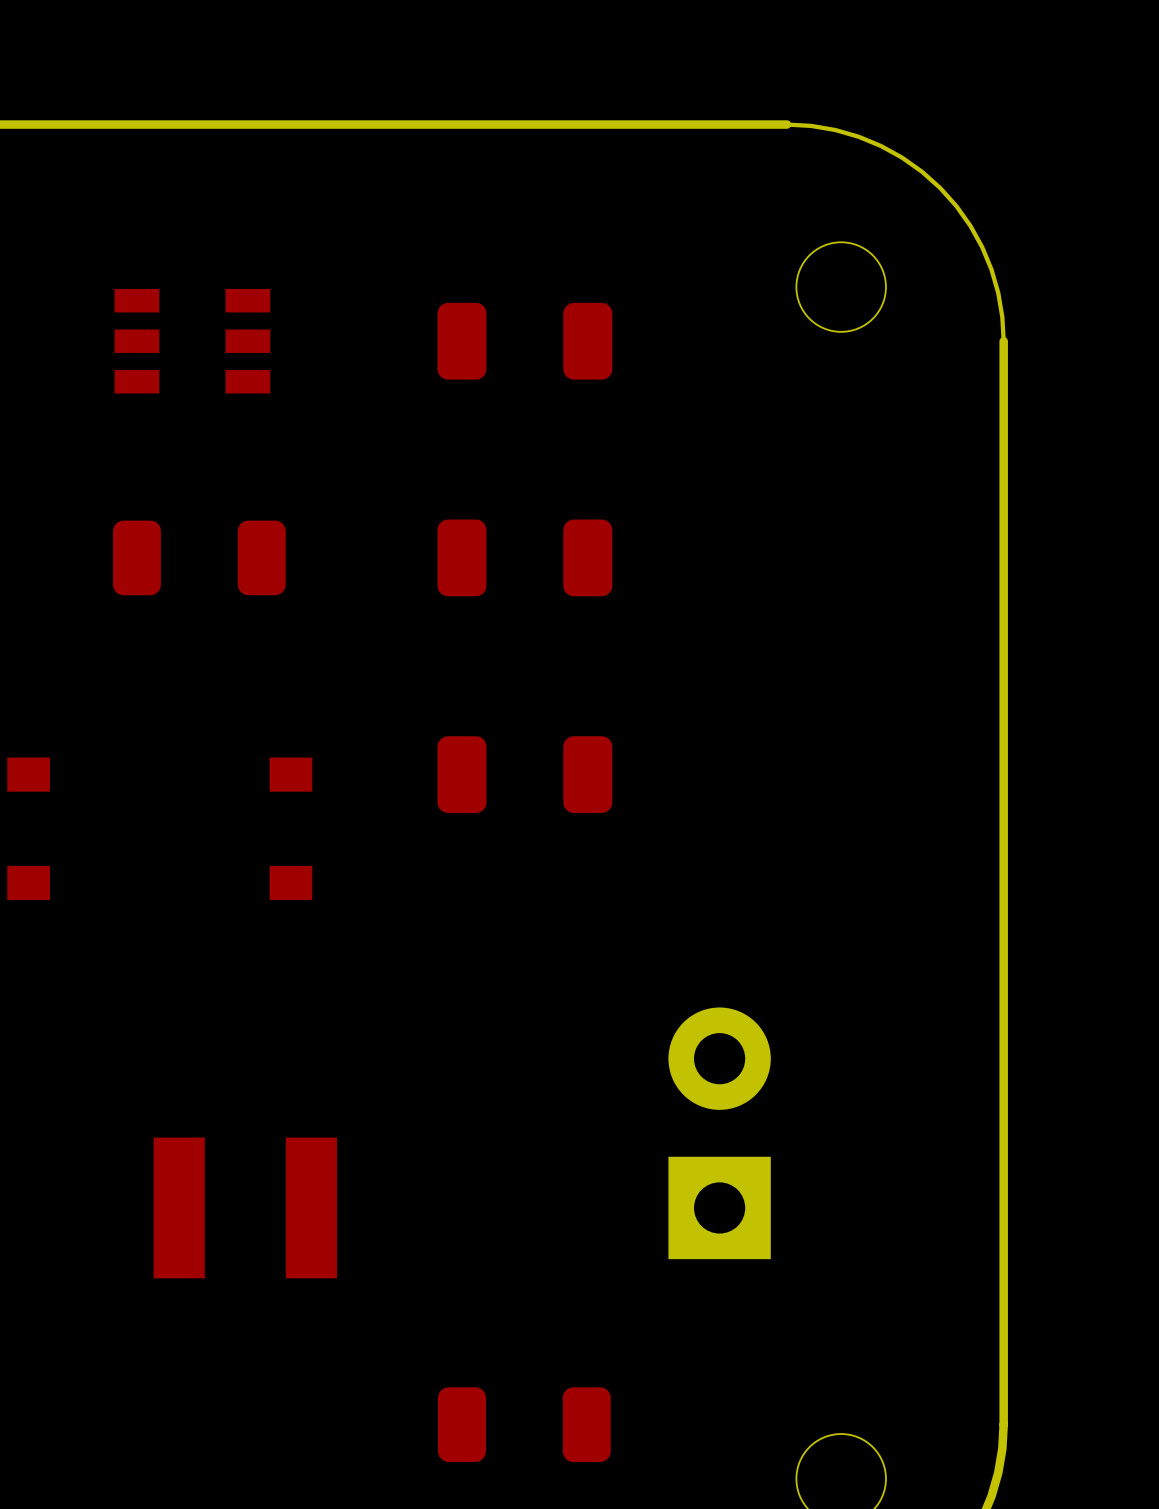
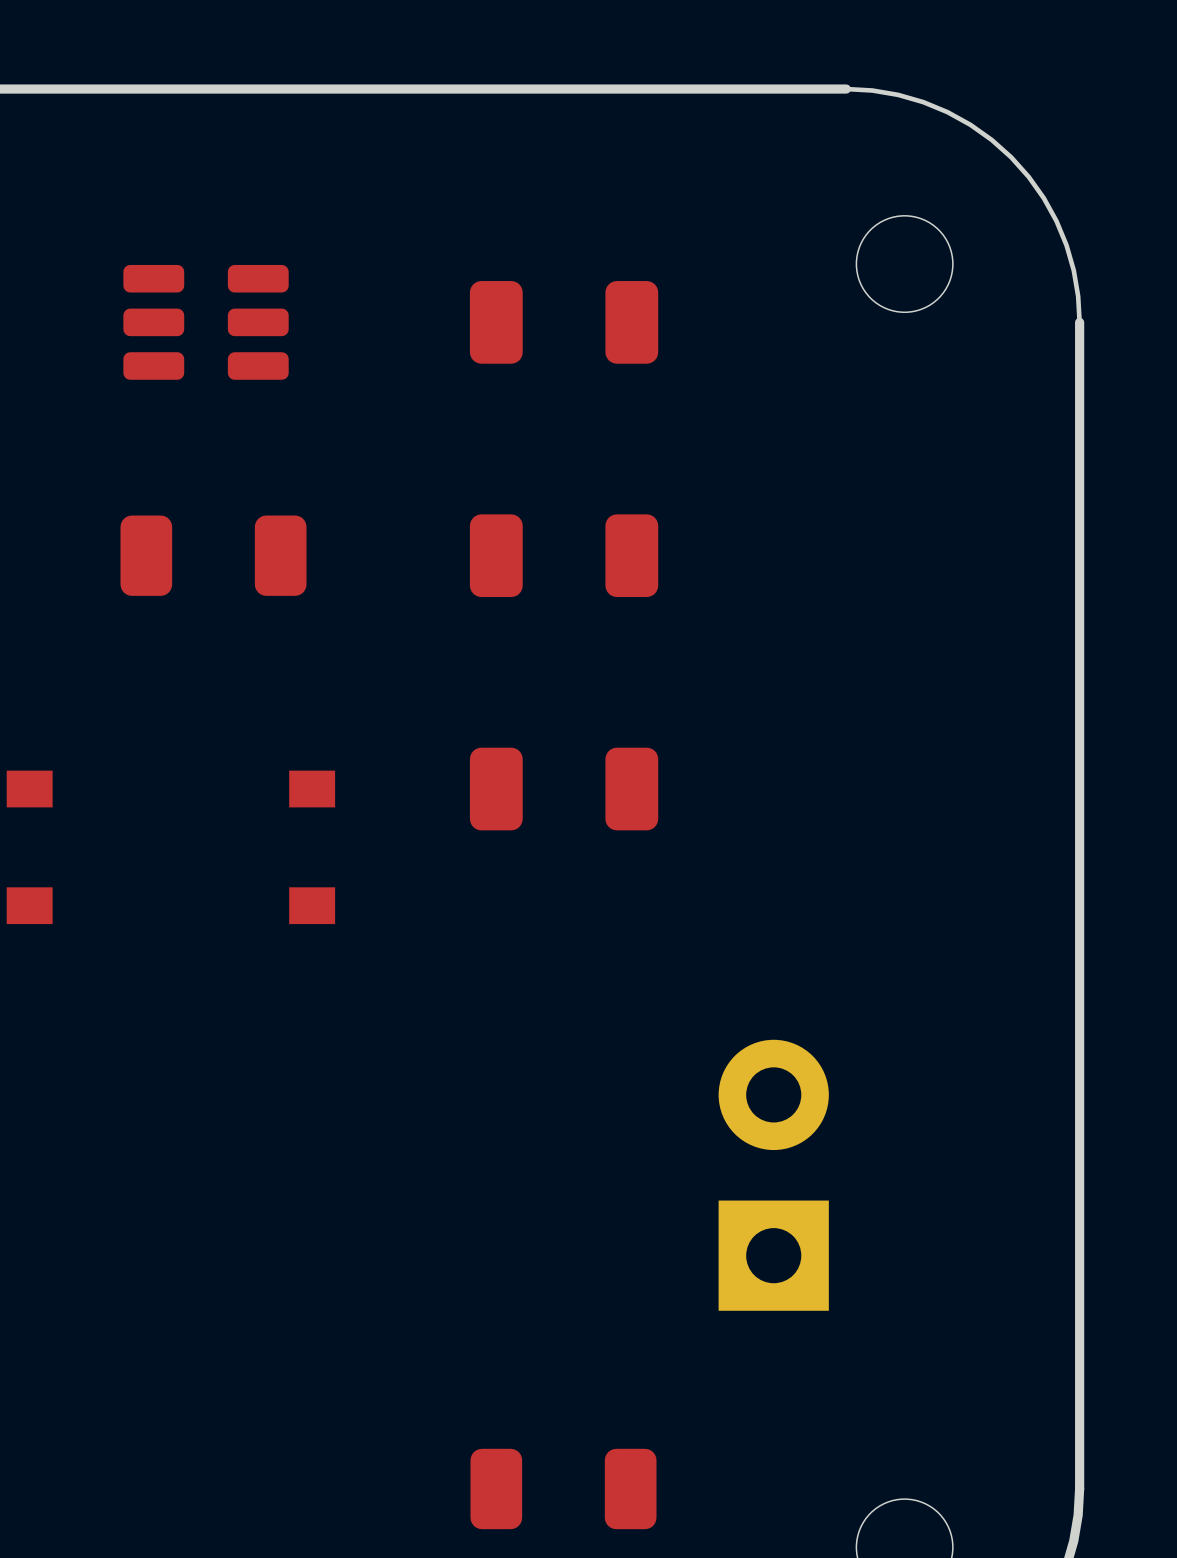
part footprint: [114, 288, 271, 394] -> [123, 264, 289, 380]
part: (245, 1207) -> none

